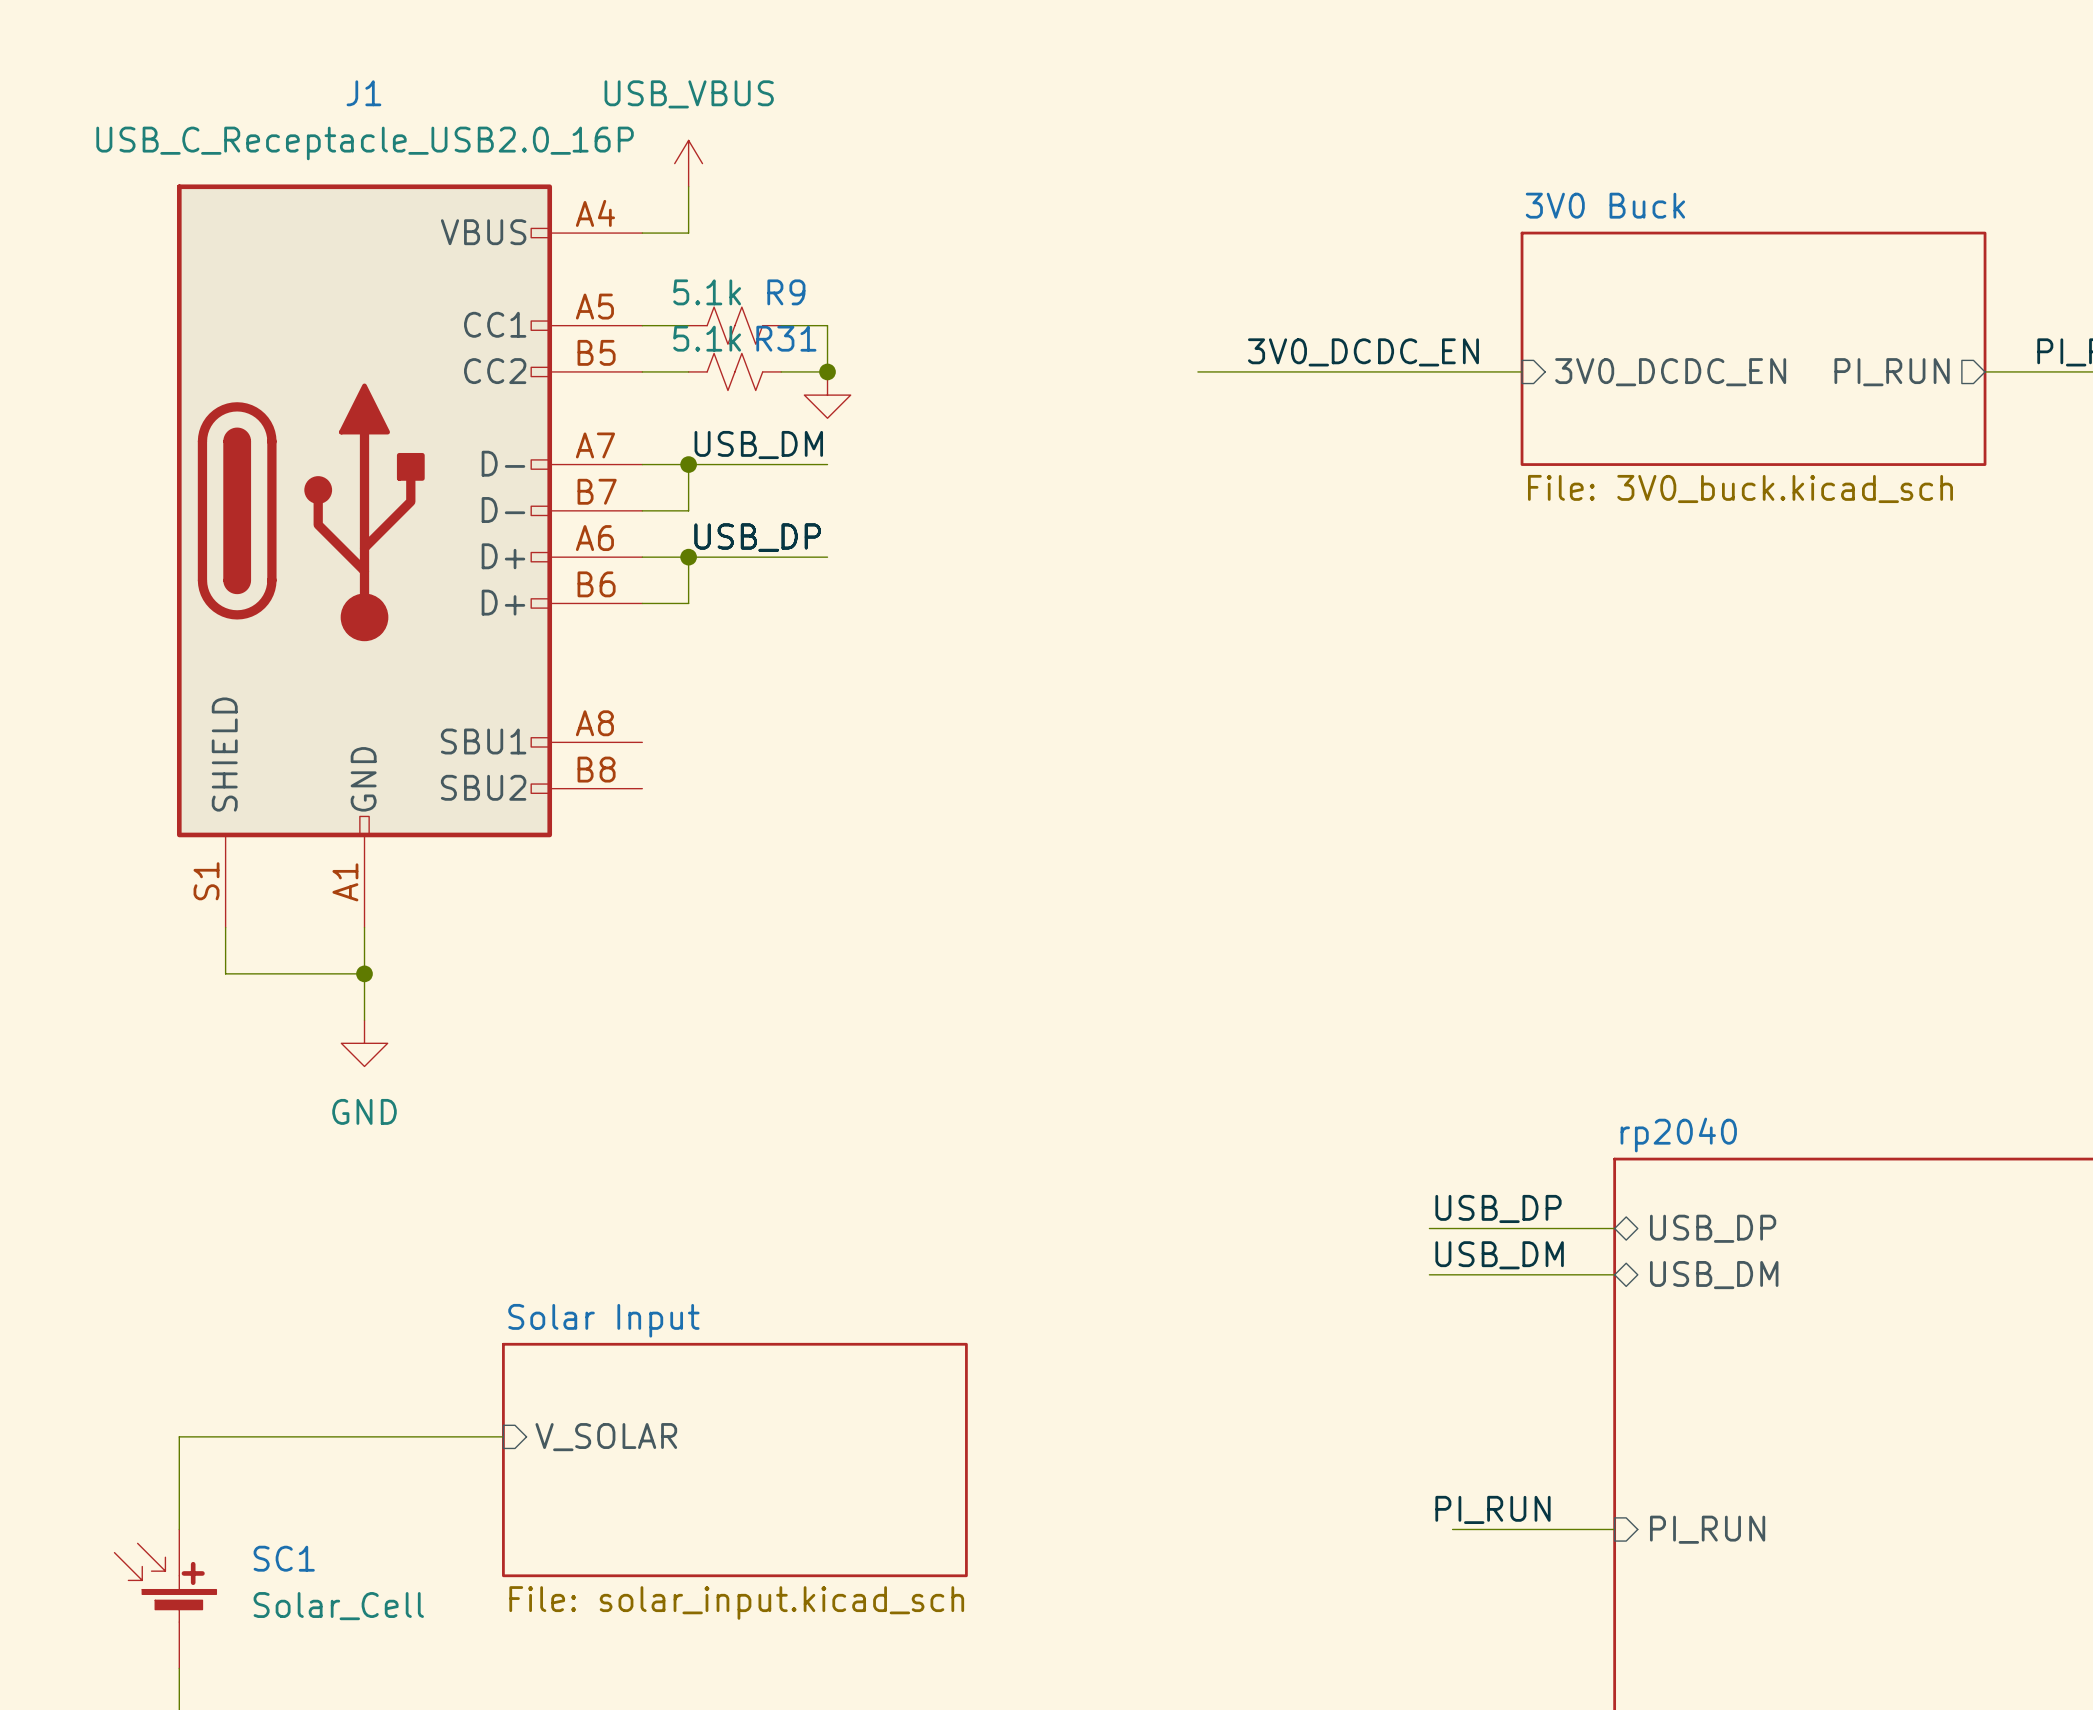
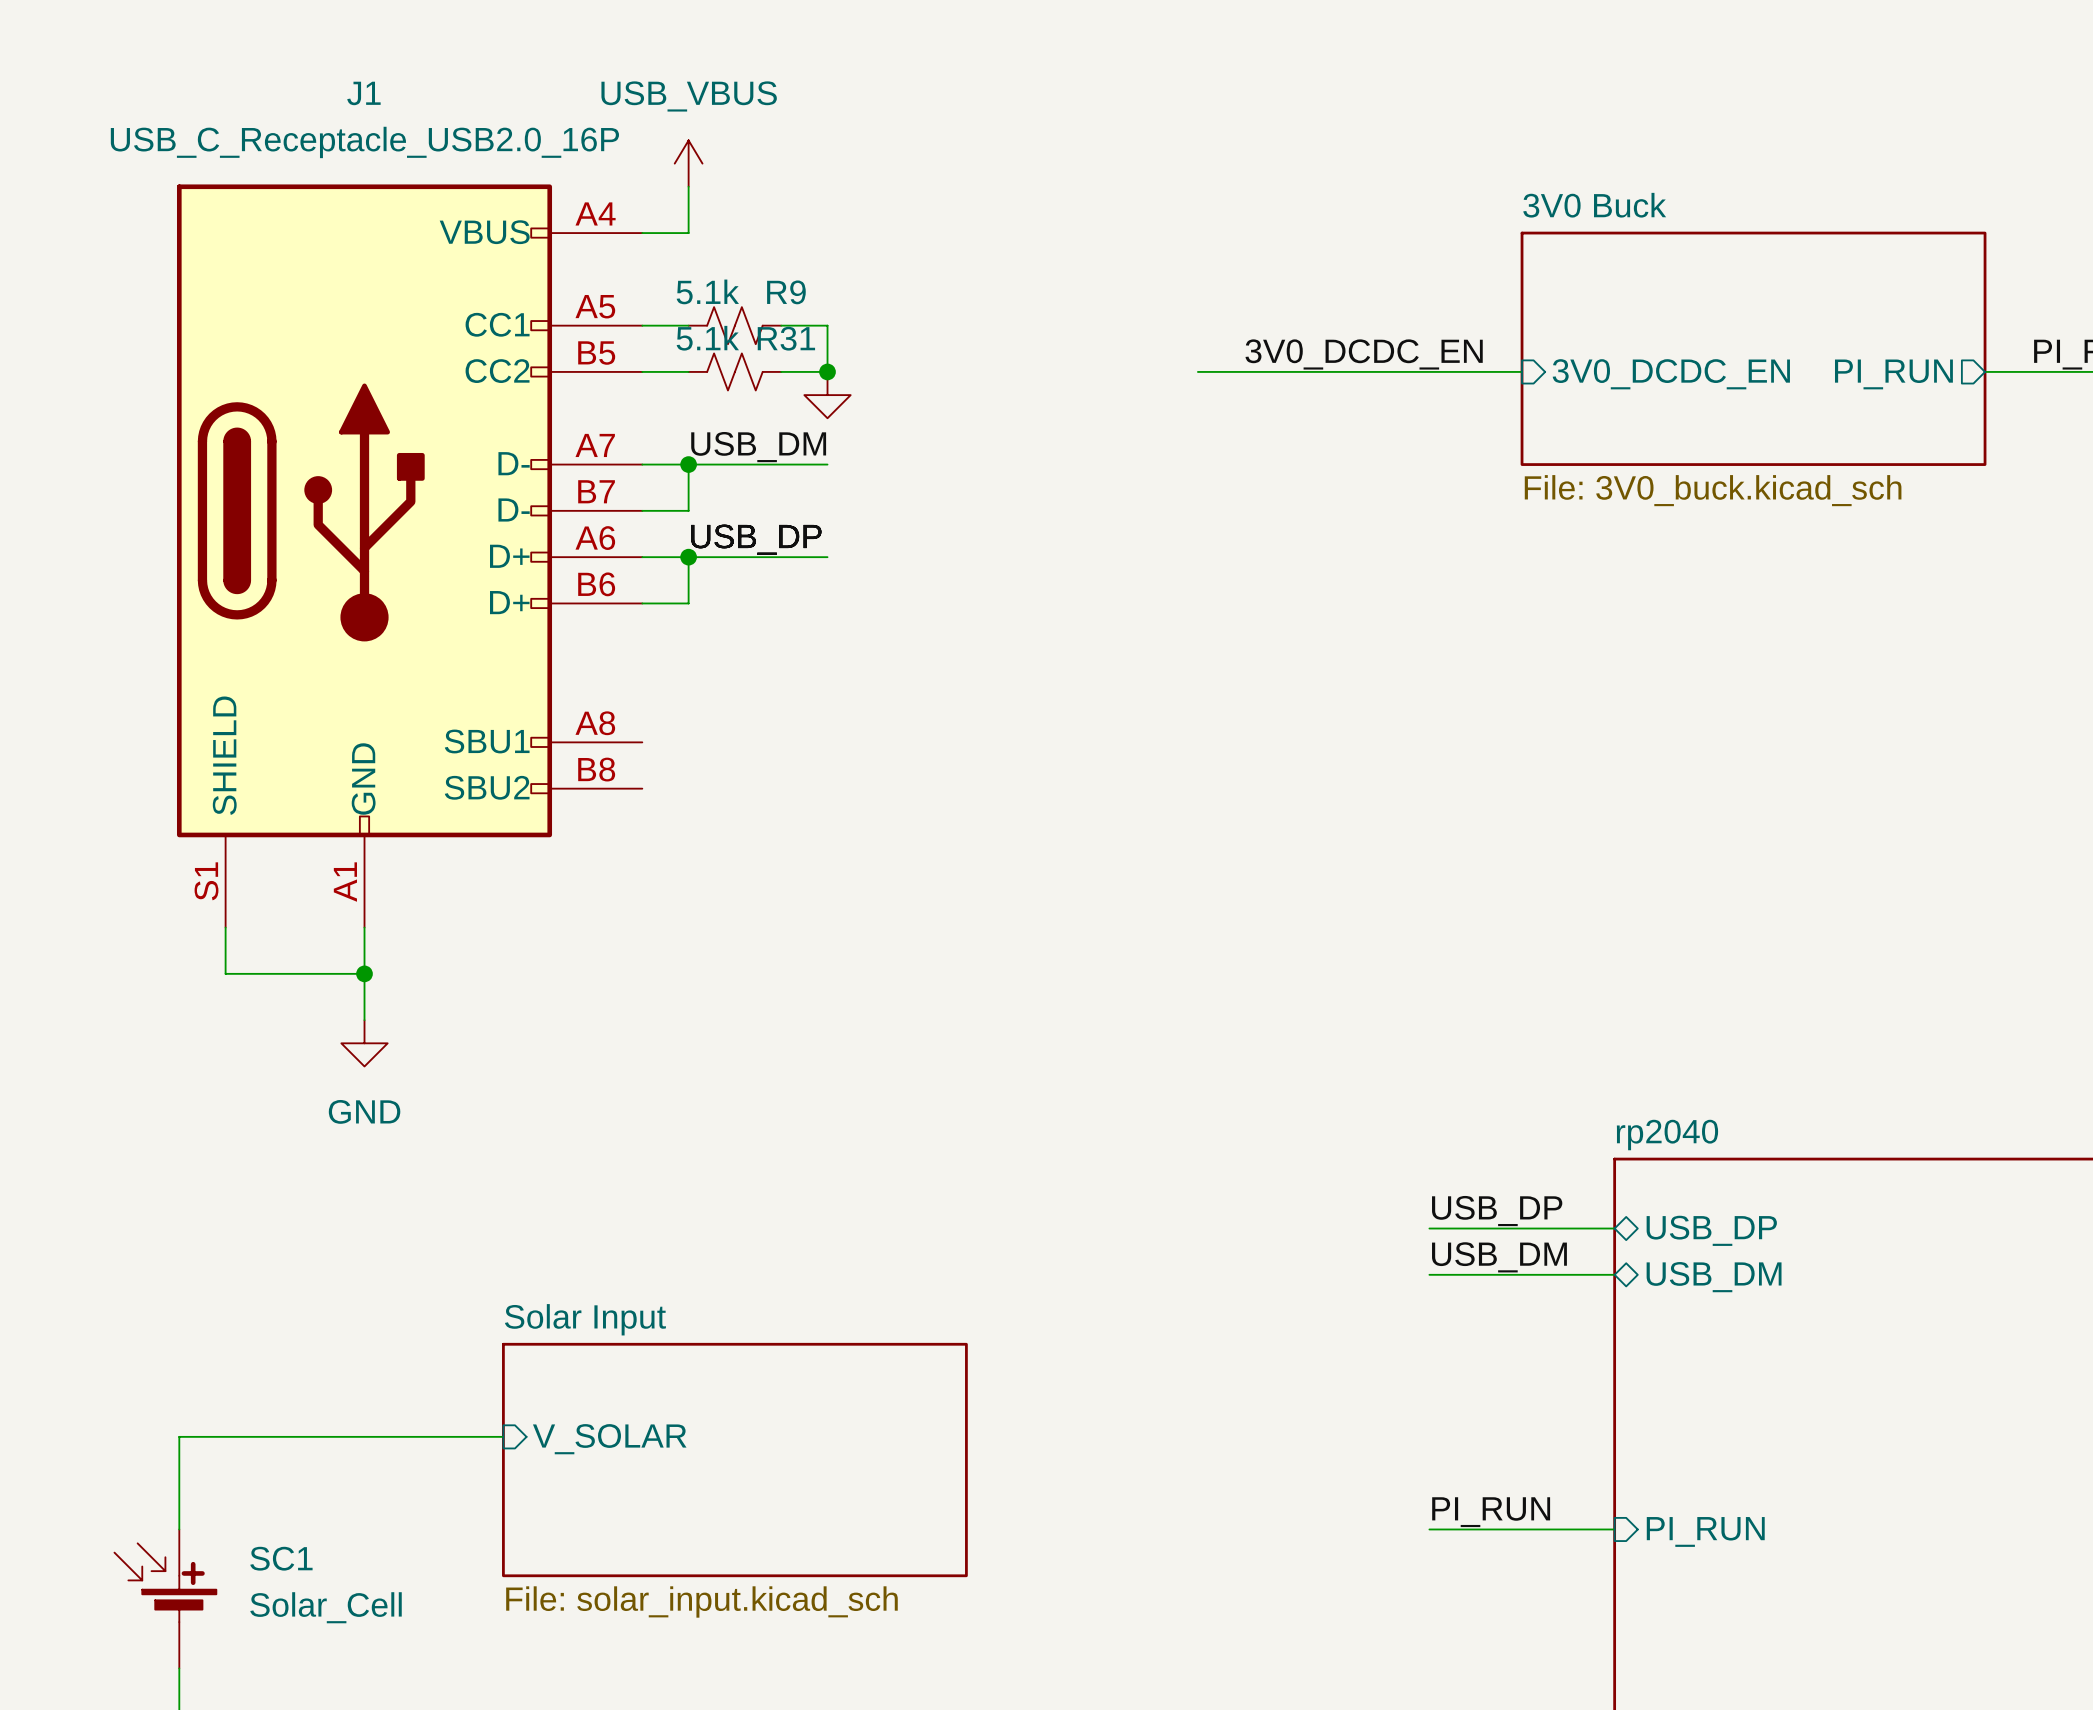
wire: none -> (1429, 1529) (1452, 1529)

